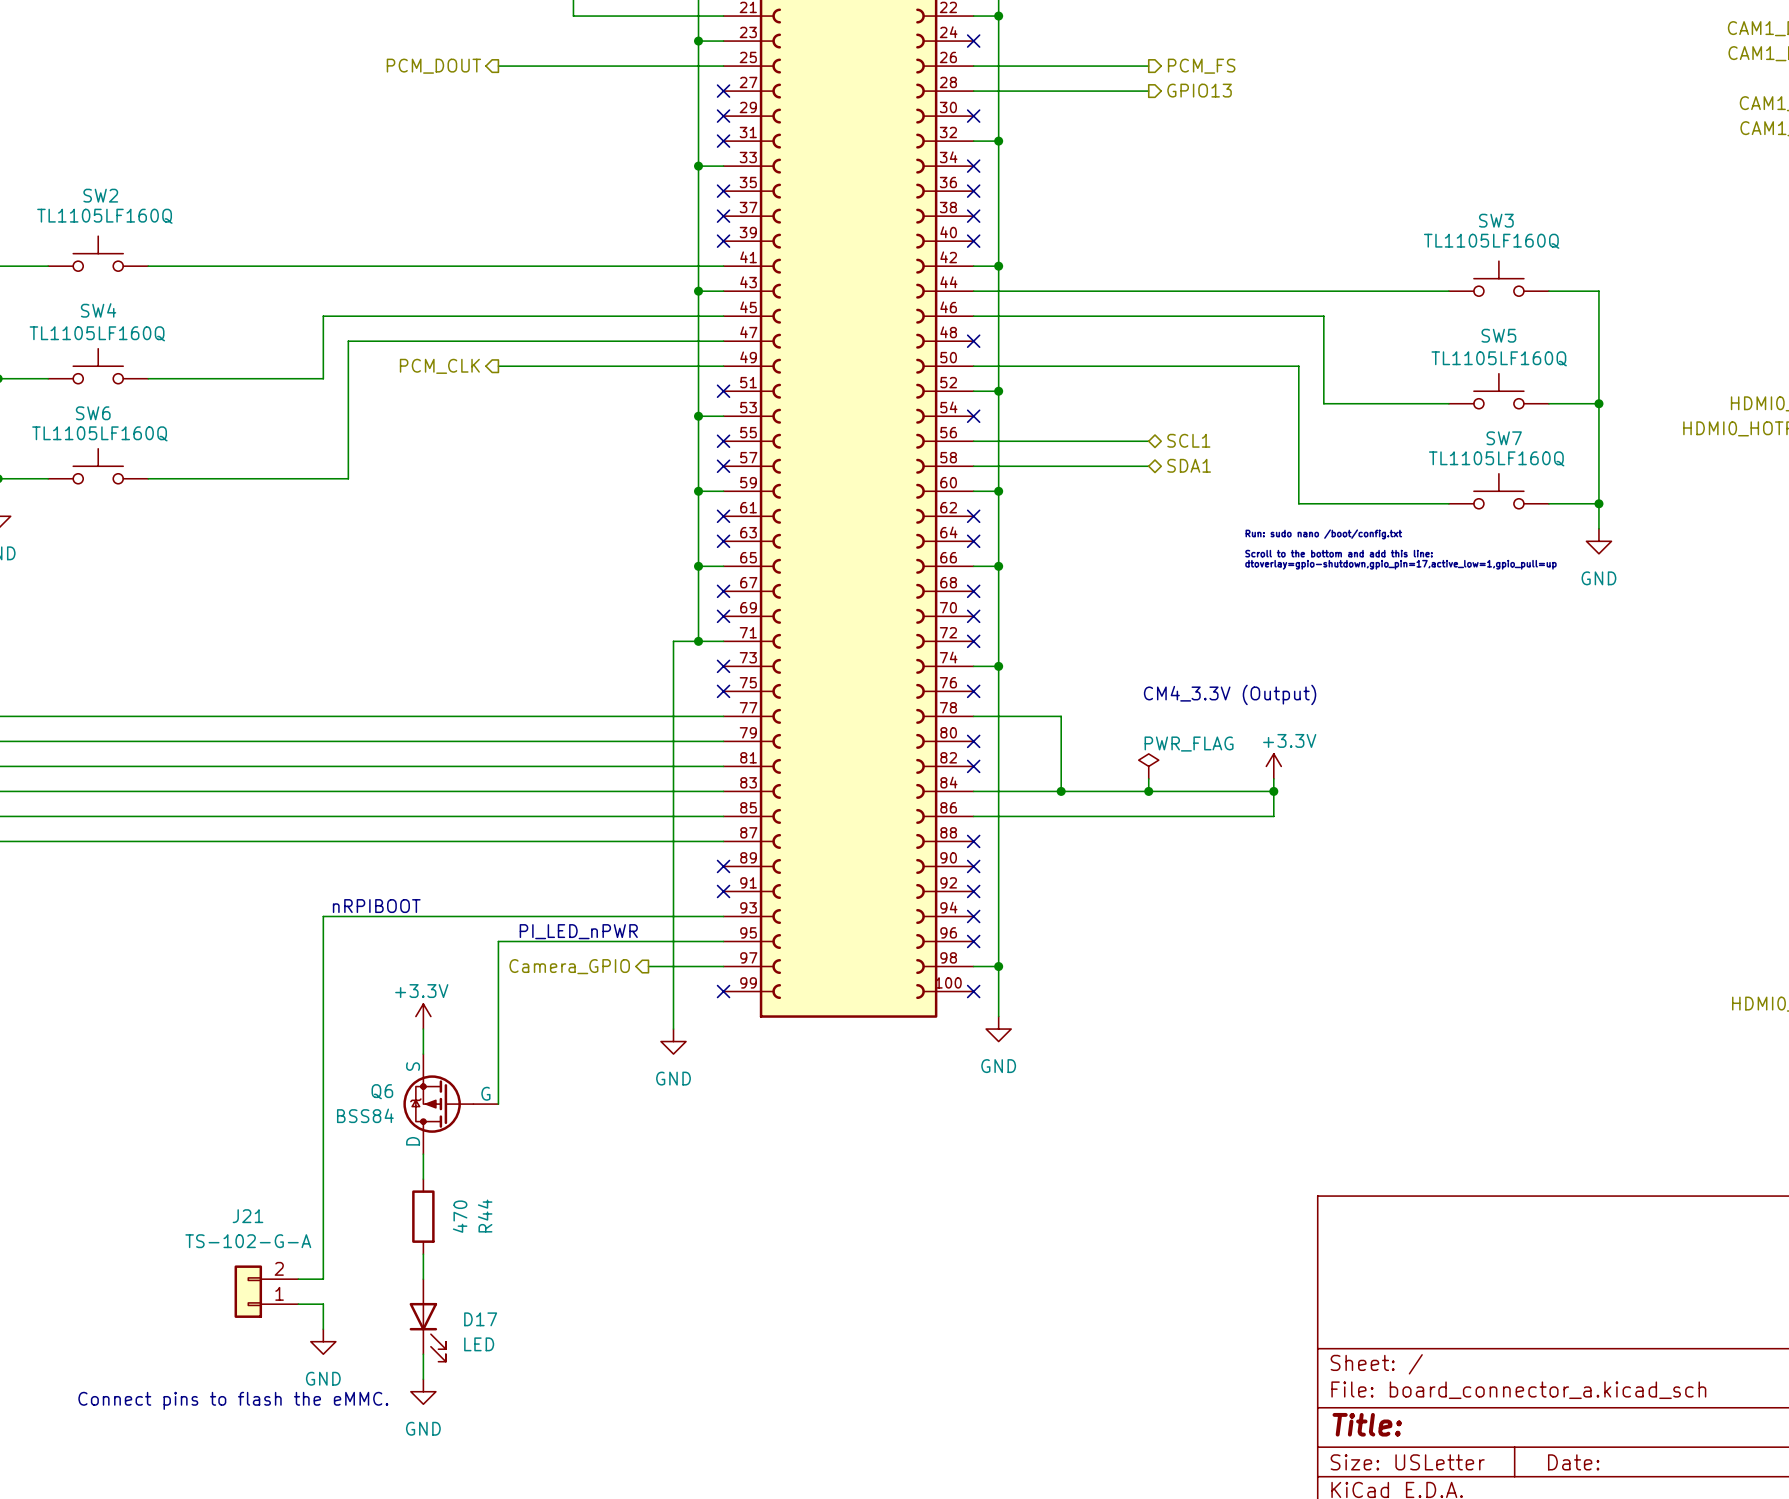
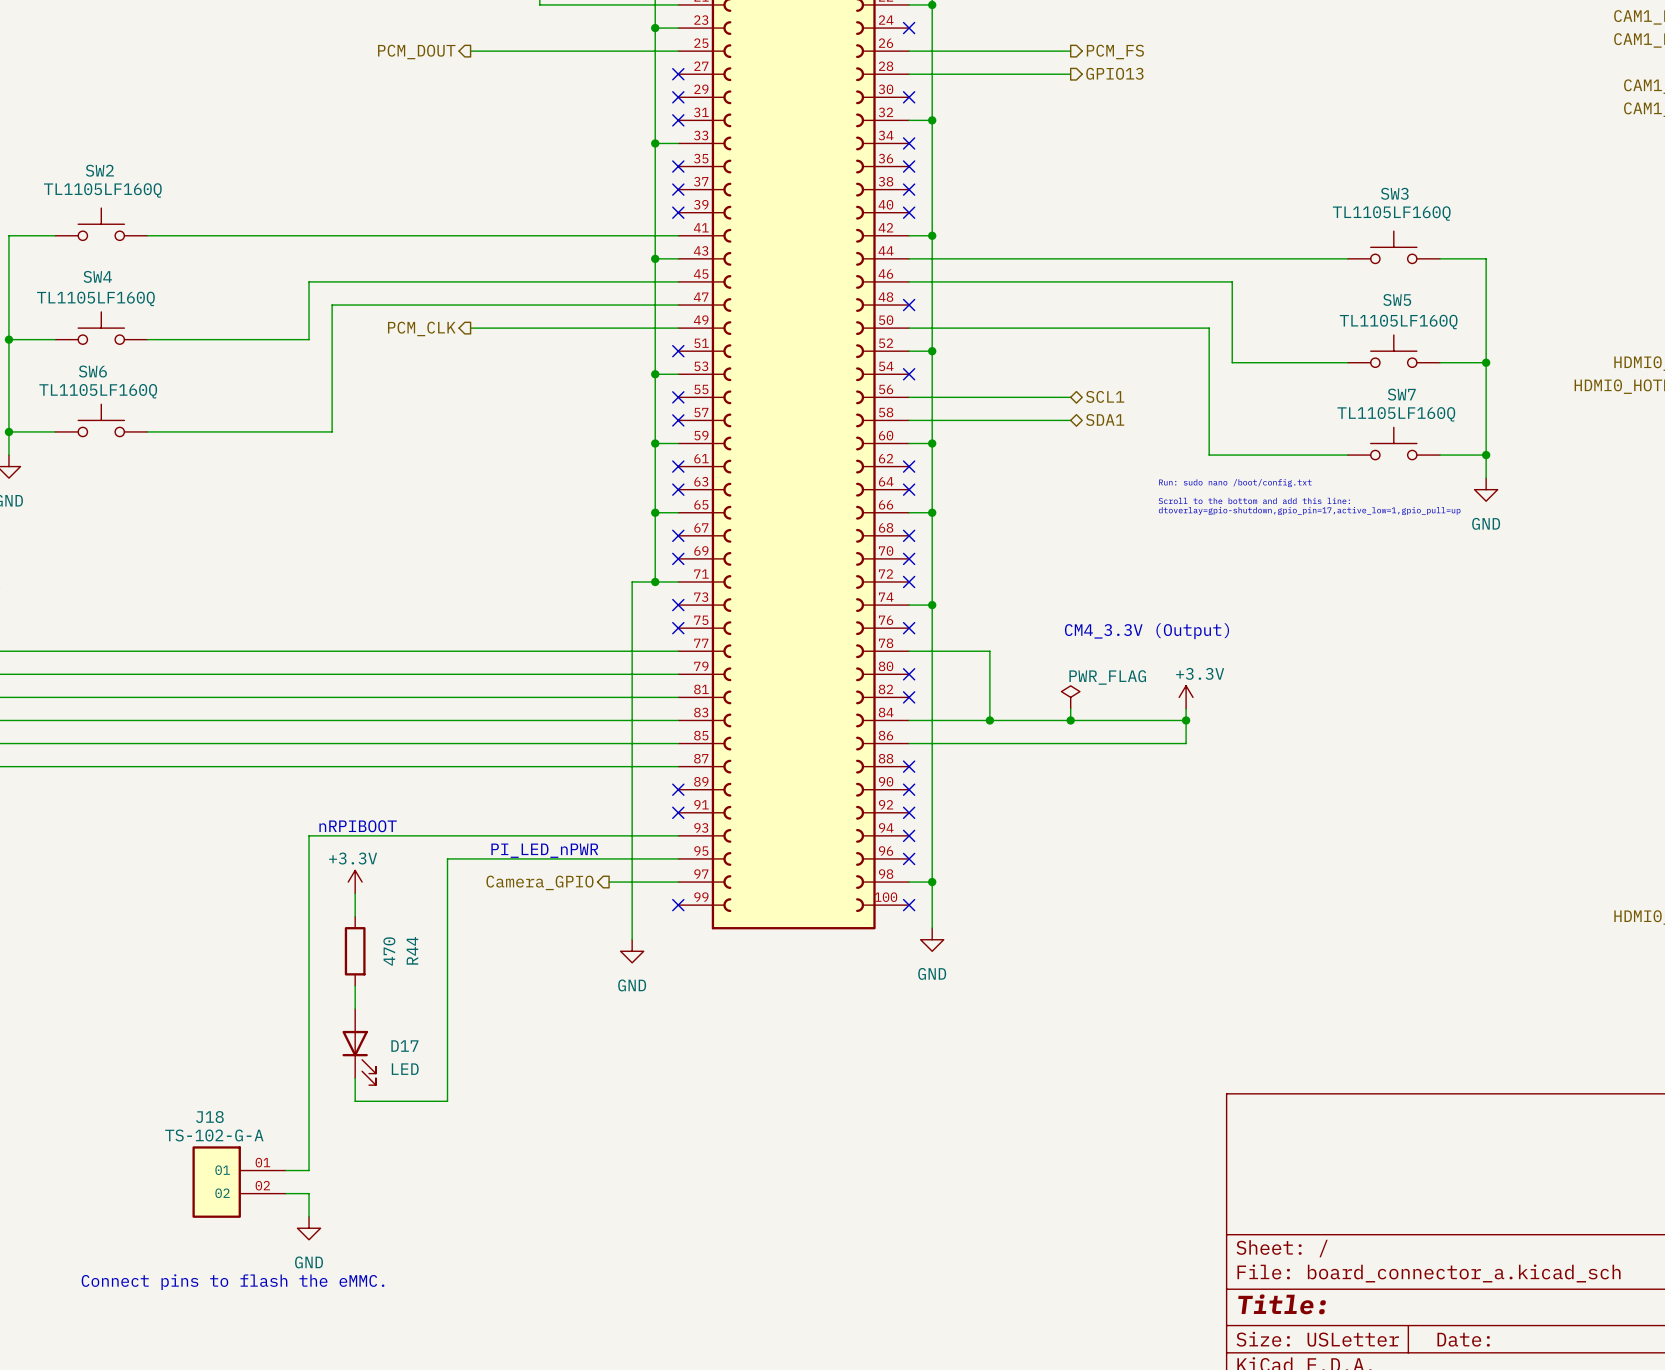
wire: (498, 941) (498, 1104) -> (470, 858) (447, 858) (447, 1101) (355, 1101) (355, 1078)
power symbol position: +3.3V (423, 1016) -> +3.3V (355, 882)
wire: (423, 1029) (423, 1054) -> (355, 893) (355, 916)
Q6: BSS84 (450, 1104) -> none
wire: (423, 1154) (423, 1179) -> (355, 985) (355, 1008)
R44 position: (423, 1216) -> (355, 951)
wire: (423, 1254) (423, 1279) -> none
J18: none -> TS-102-G-A (239, 1182)
J21: TS-102-G-A (266, 1291) -> none
D17 position: (427, 1320) -> (359, 1047)
wire: (423, 1354) (423, 1379) -> none
power symbol: GND (423, 1391) -> none

